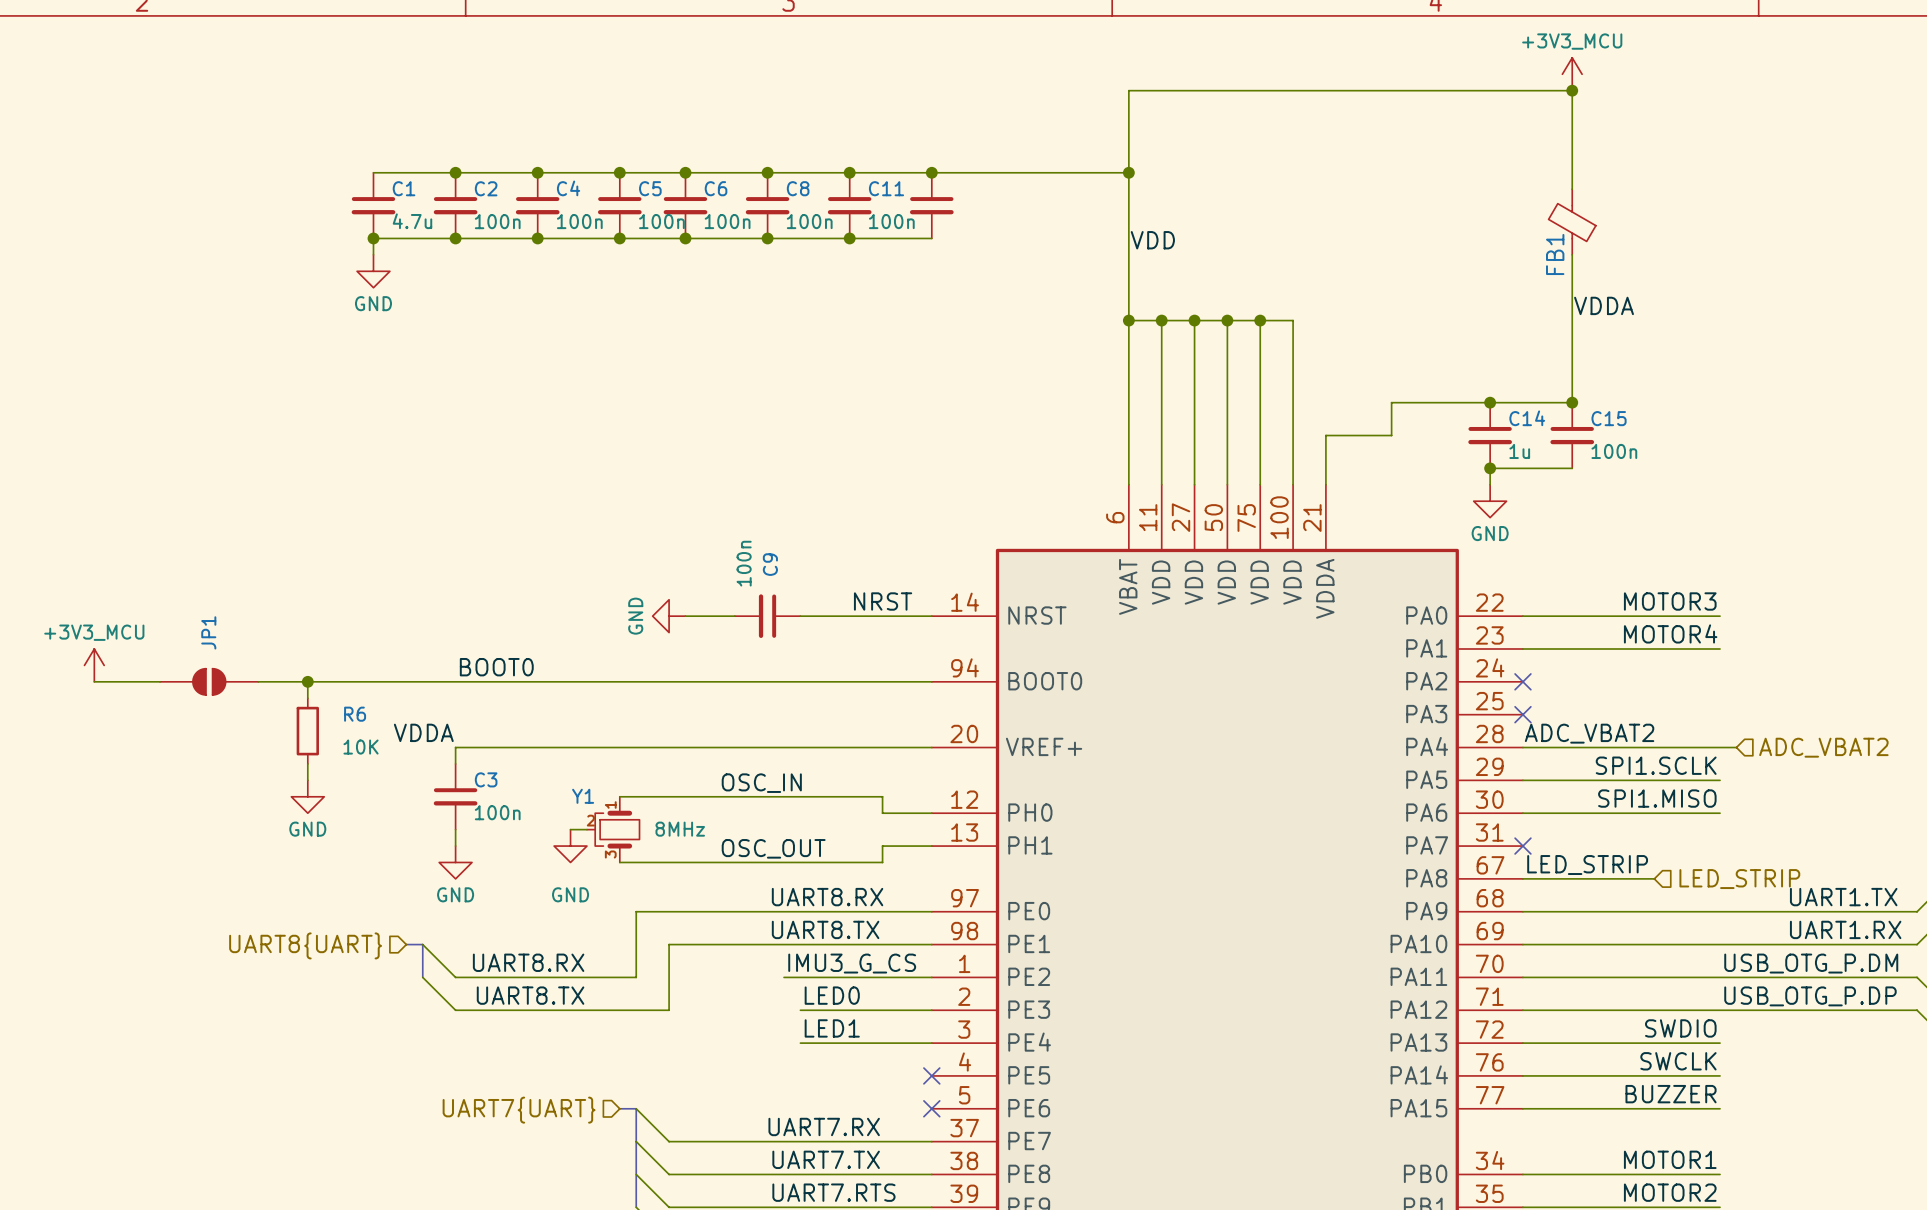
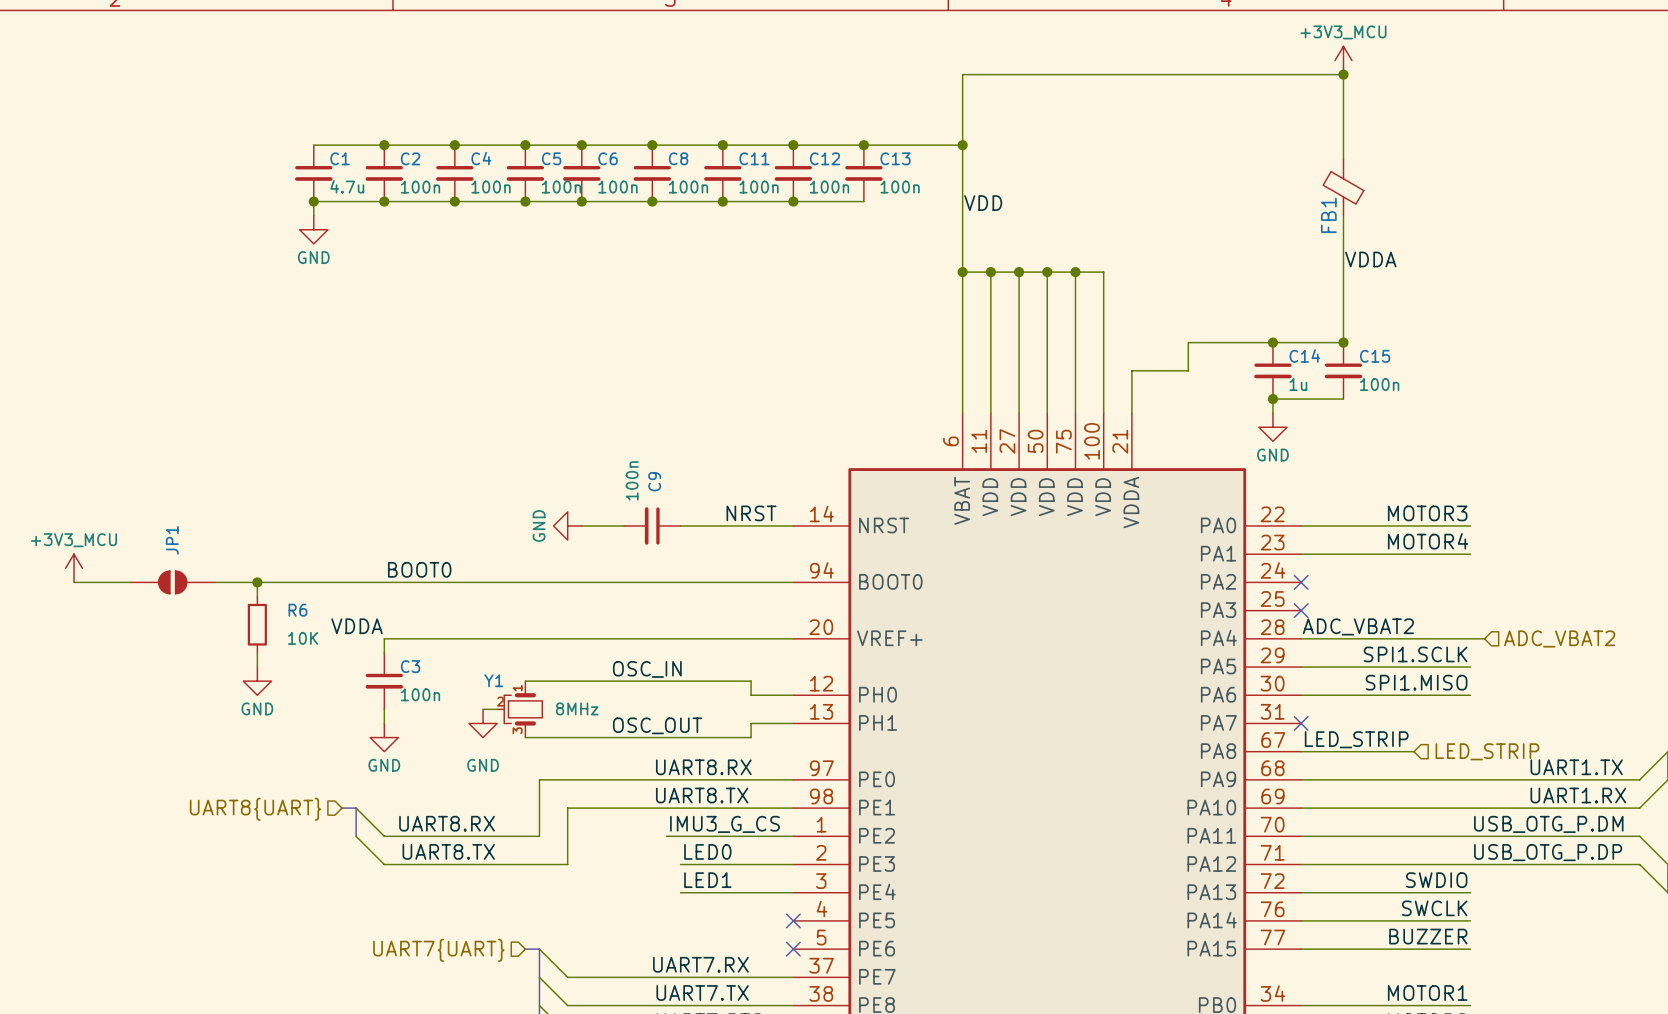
junction: none -> (863, 145)
C12 name: none -> C12 (824, 158)
C13: none -> 100n (863, 173)
C12 value: none -> 100n (829, 187)
wire: none -> (793, 201) (863, 201)
junction: none -> (793, 201)

